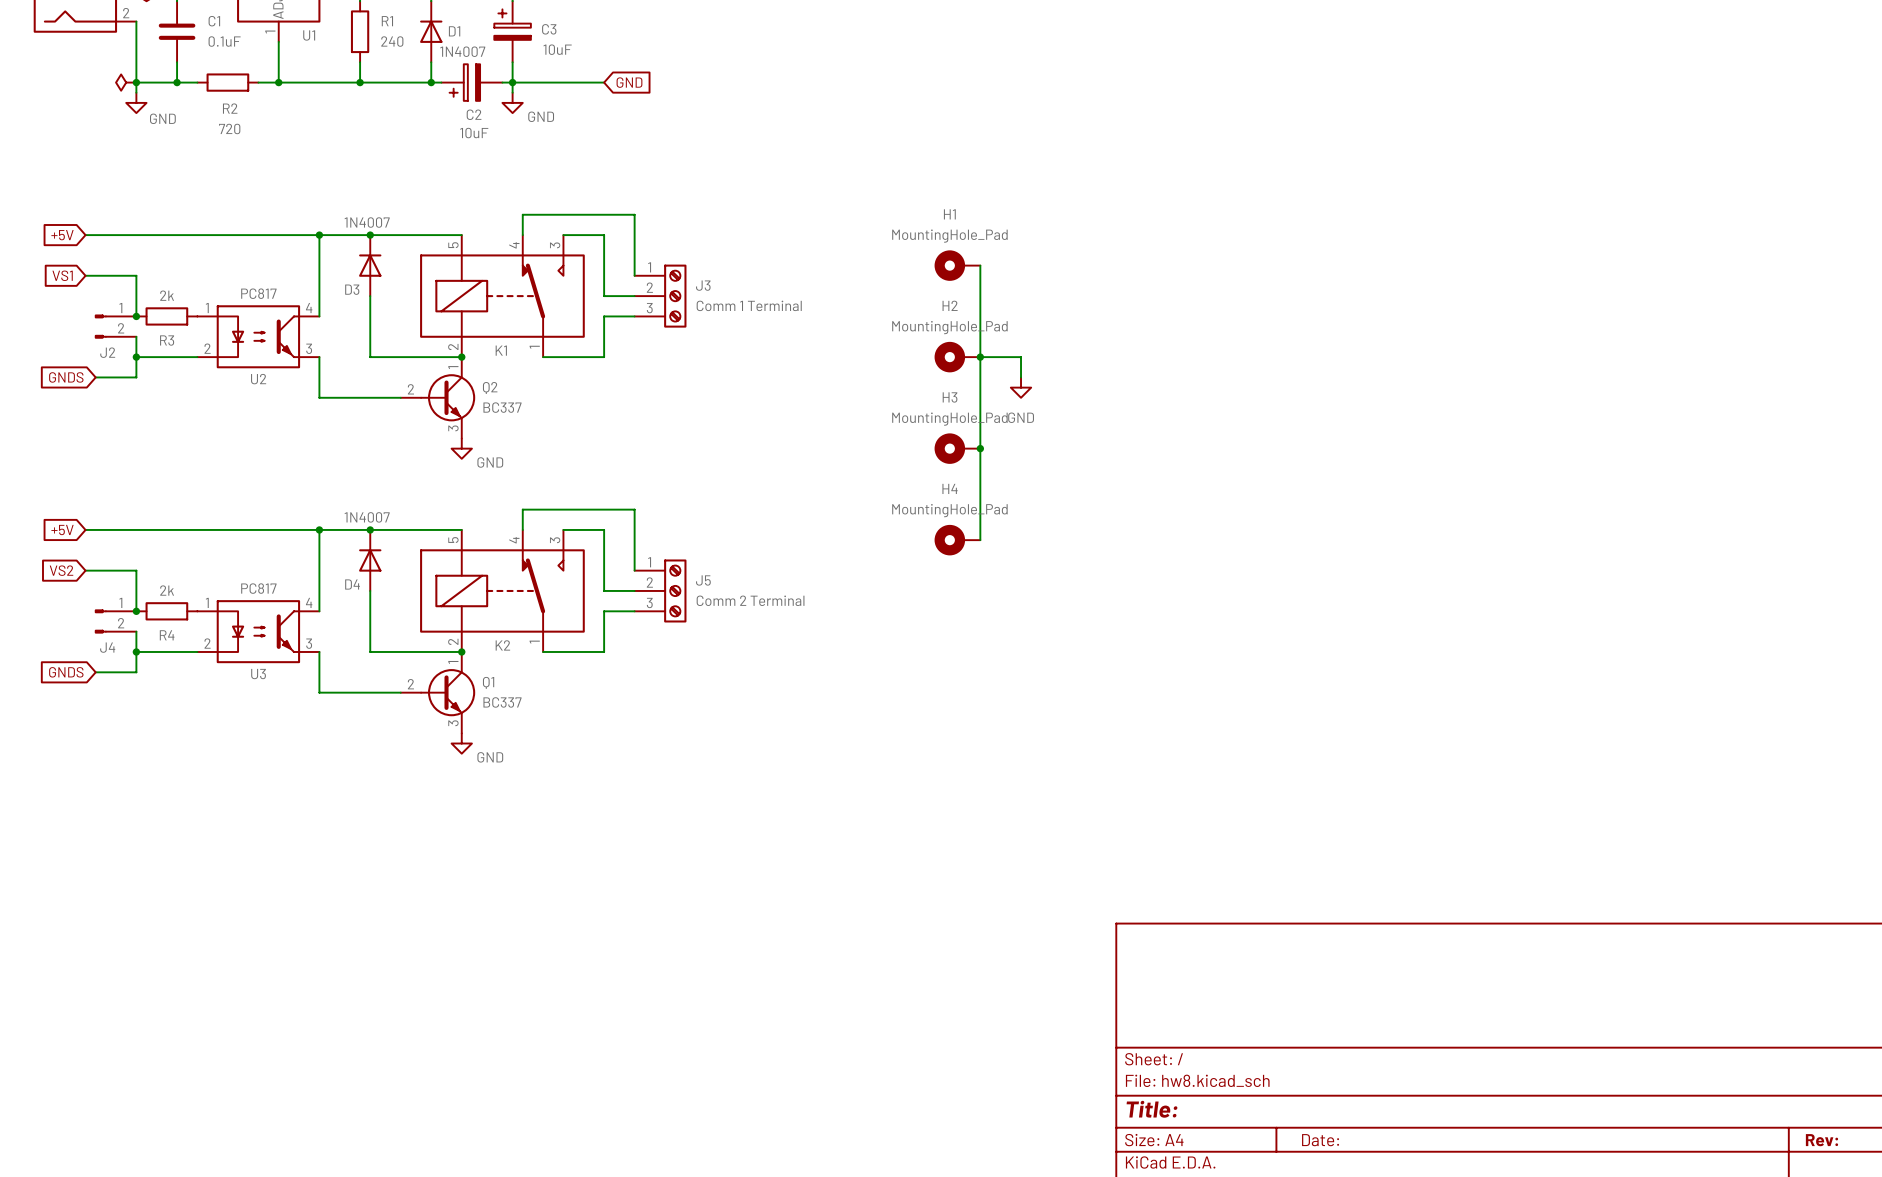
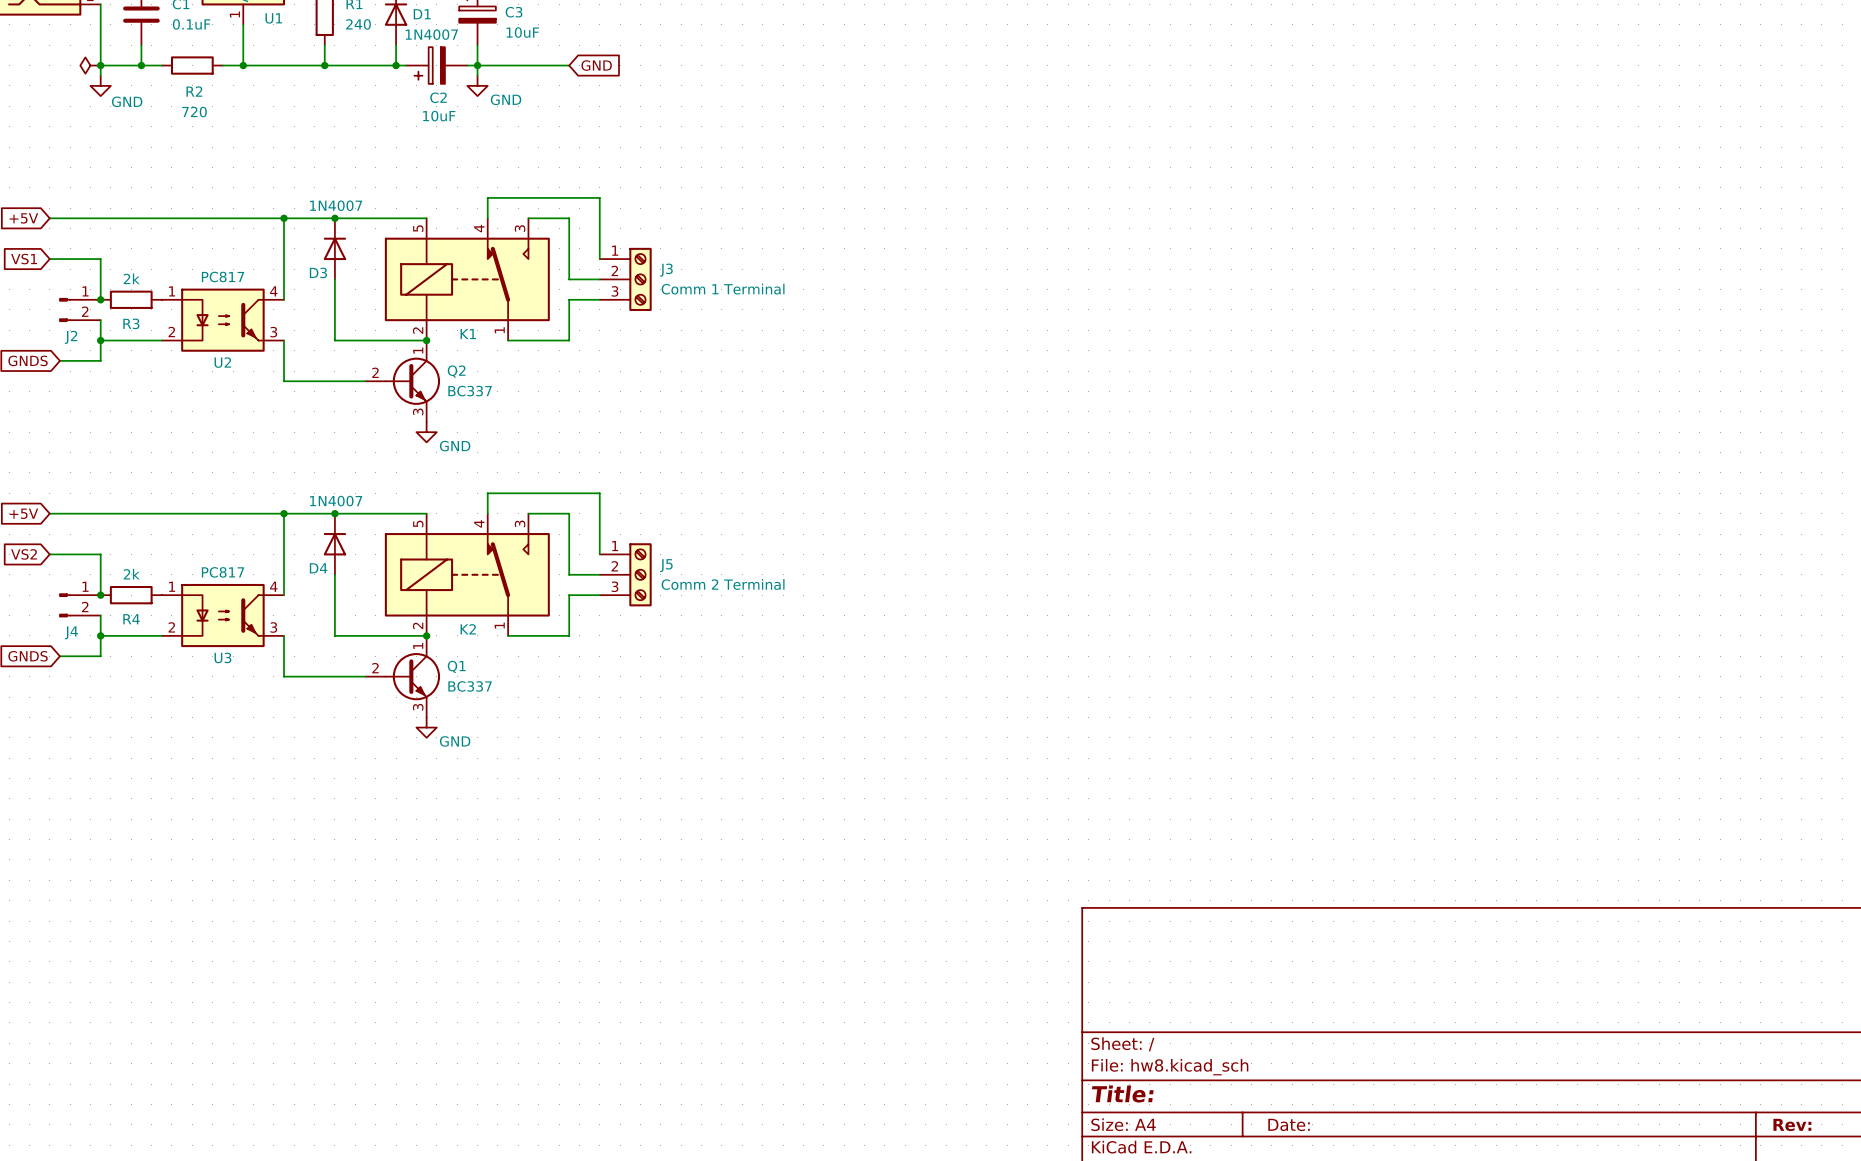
H1: MountingHole_Pad (957, 265) -> none
wire: (980, 265) (980, 540) -> none
H2: MountingHole_Pad (957, 357) -> none
wire: (980, 357) (1021, 357) (1021, 377) -> none
junction: (980, 357) -> none
power symbol: GND (1021, 387) -> none
H3: MountingHole_Pad (957, 448) -> none
junction: (980, 448) -> none
H4: MountingHole_Pad (957, 540) -> none

